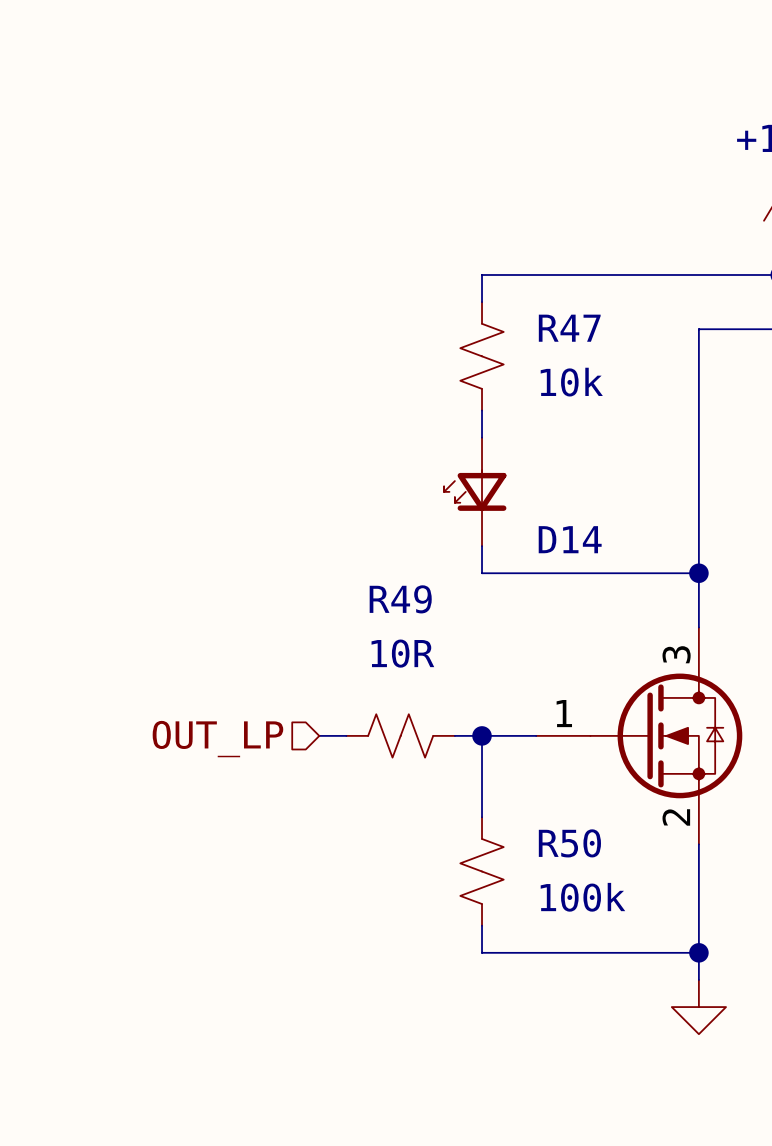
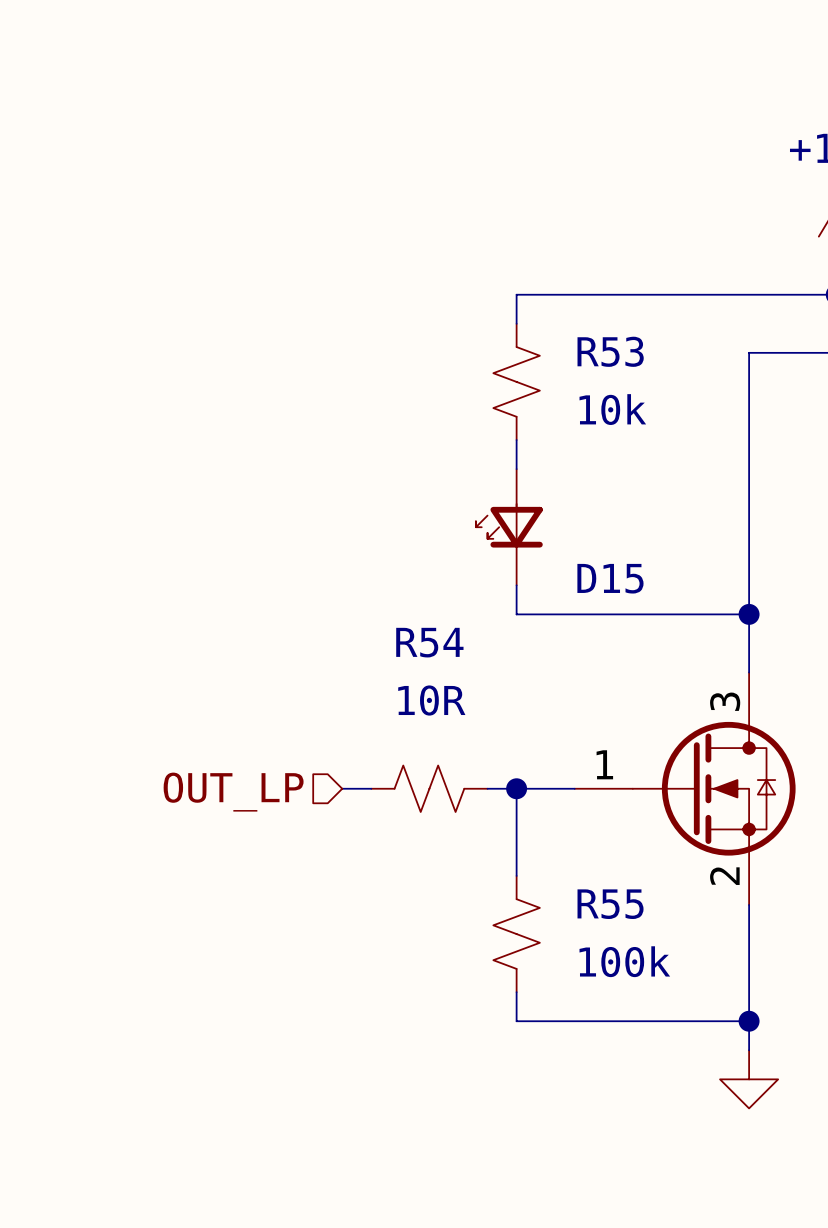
R47 name: R47 (569, 328) -> R53 (610, 351)
D14 name: D14 (570, 539) -> D15 (610, 578)
R49 name: R49 (400, 599) -> R54 (429, 642)
R50 name: R50 (569, 843) -> R55 (610, 904)

